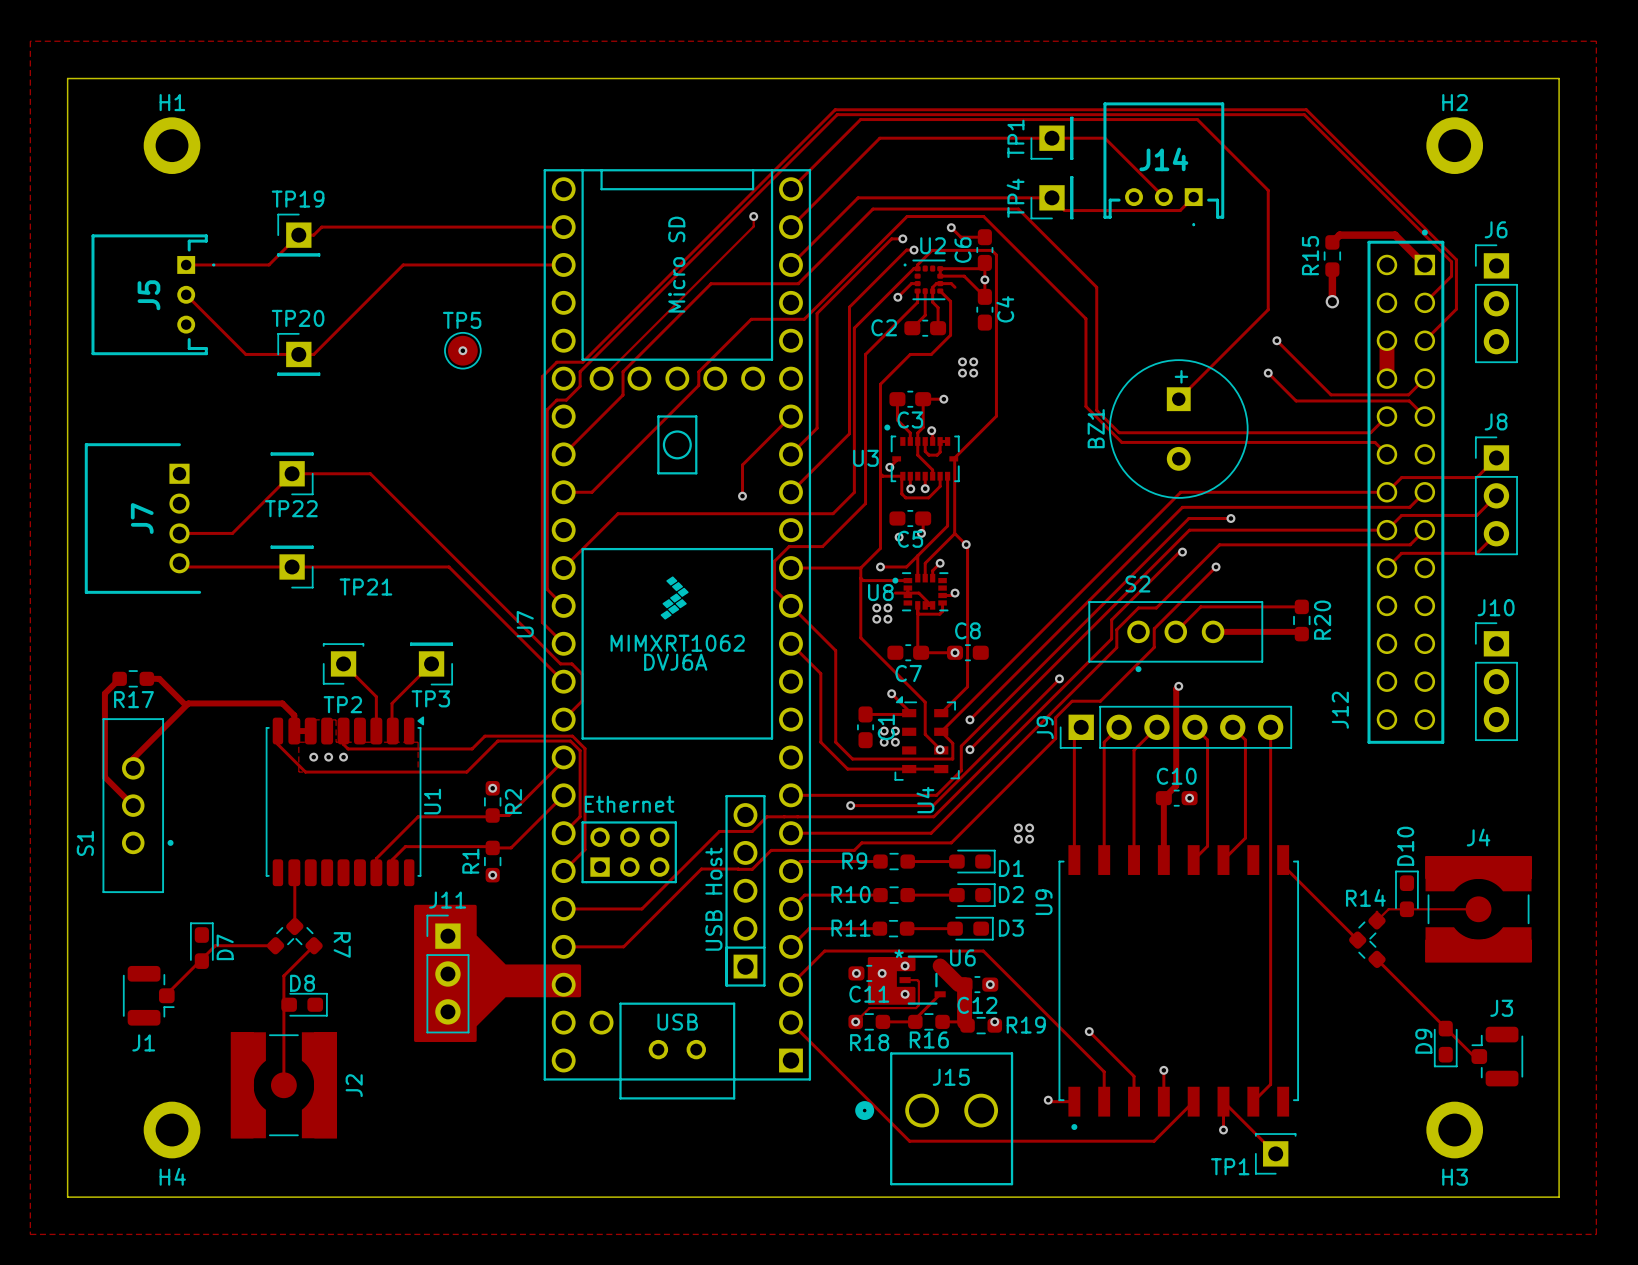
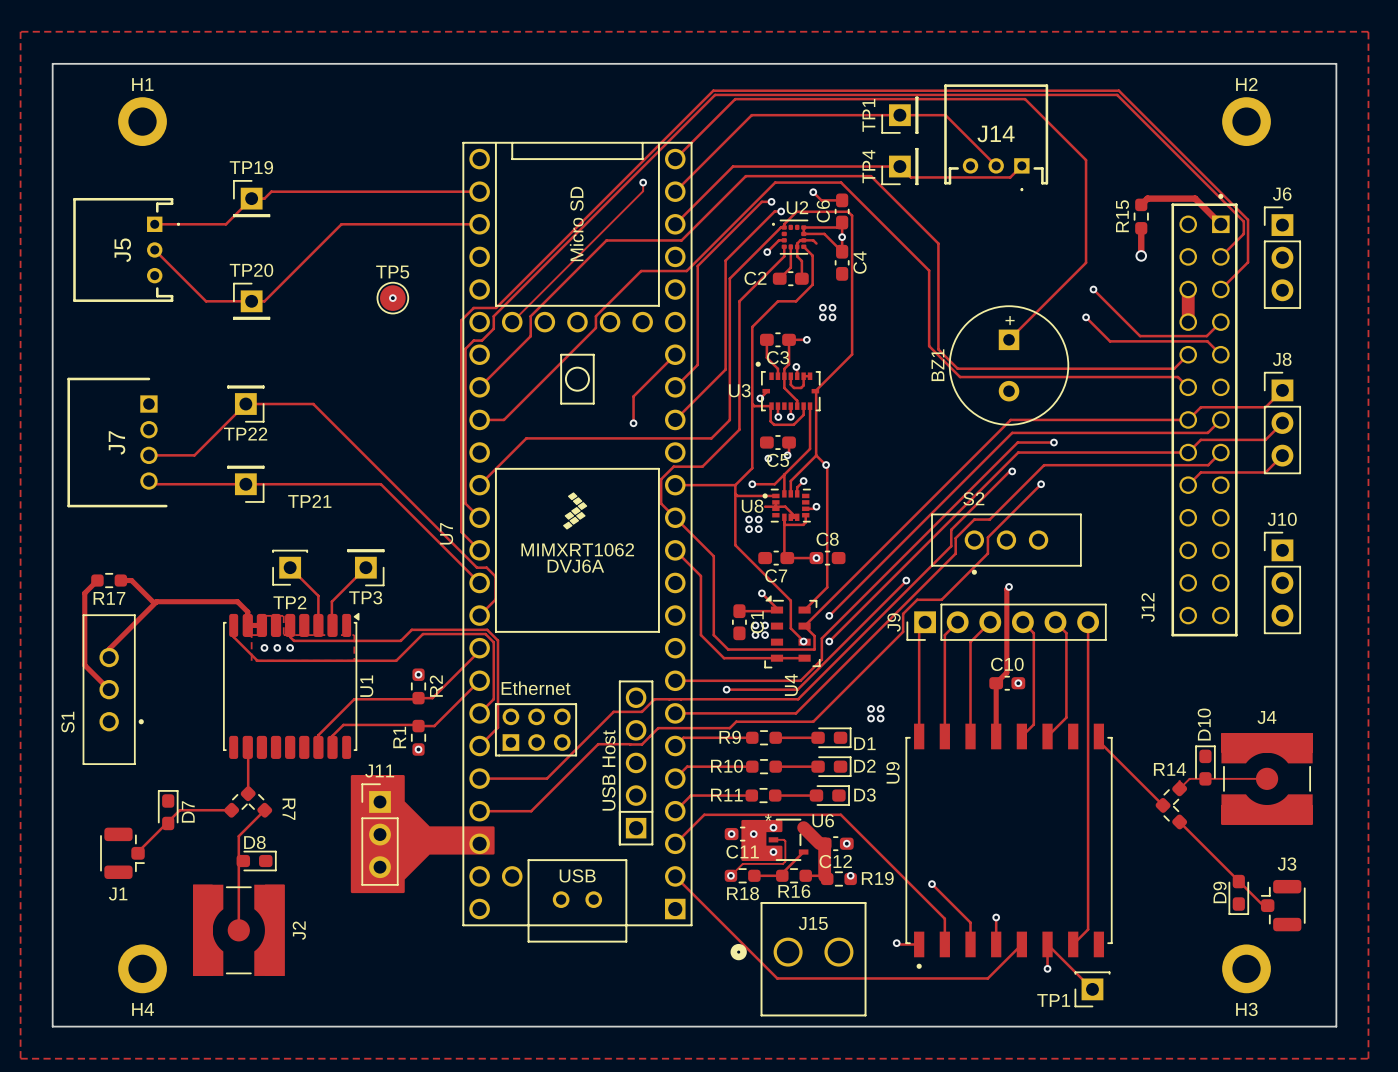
track: (1301, 606) (1200, 606) (1175, 631) -> none
R20: (1301, 620) -> none
track: (1213, 631) (1299, 631) (1301, 634) -> none

